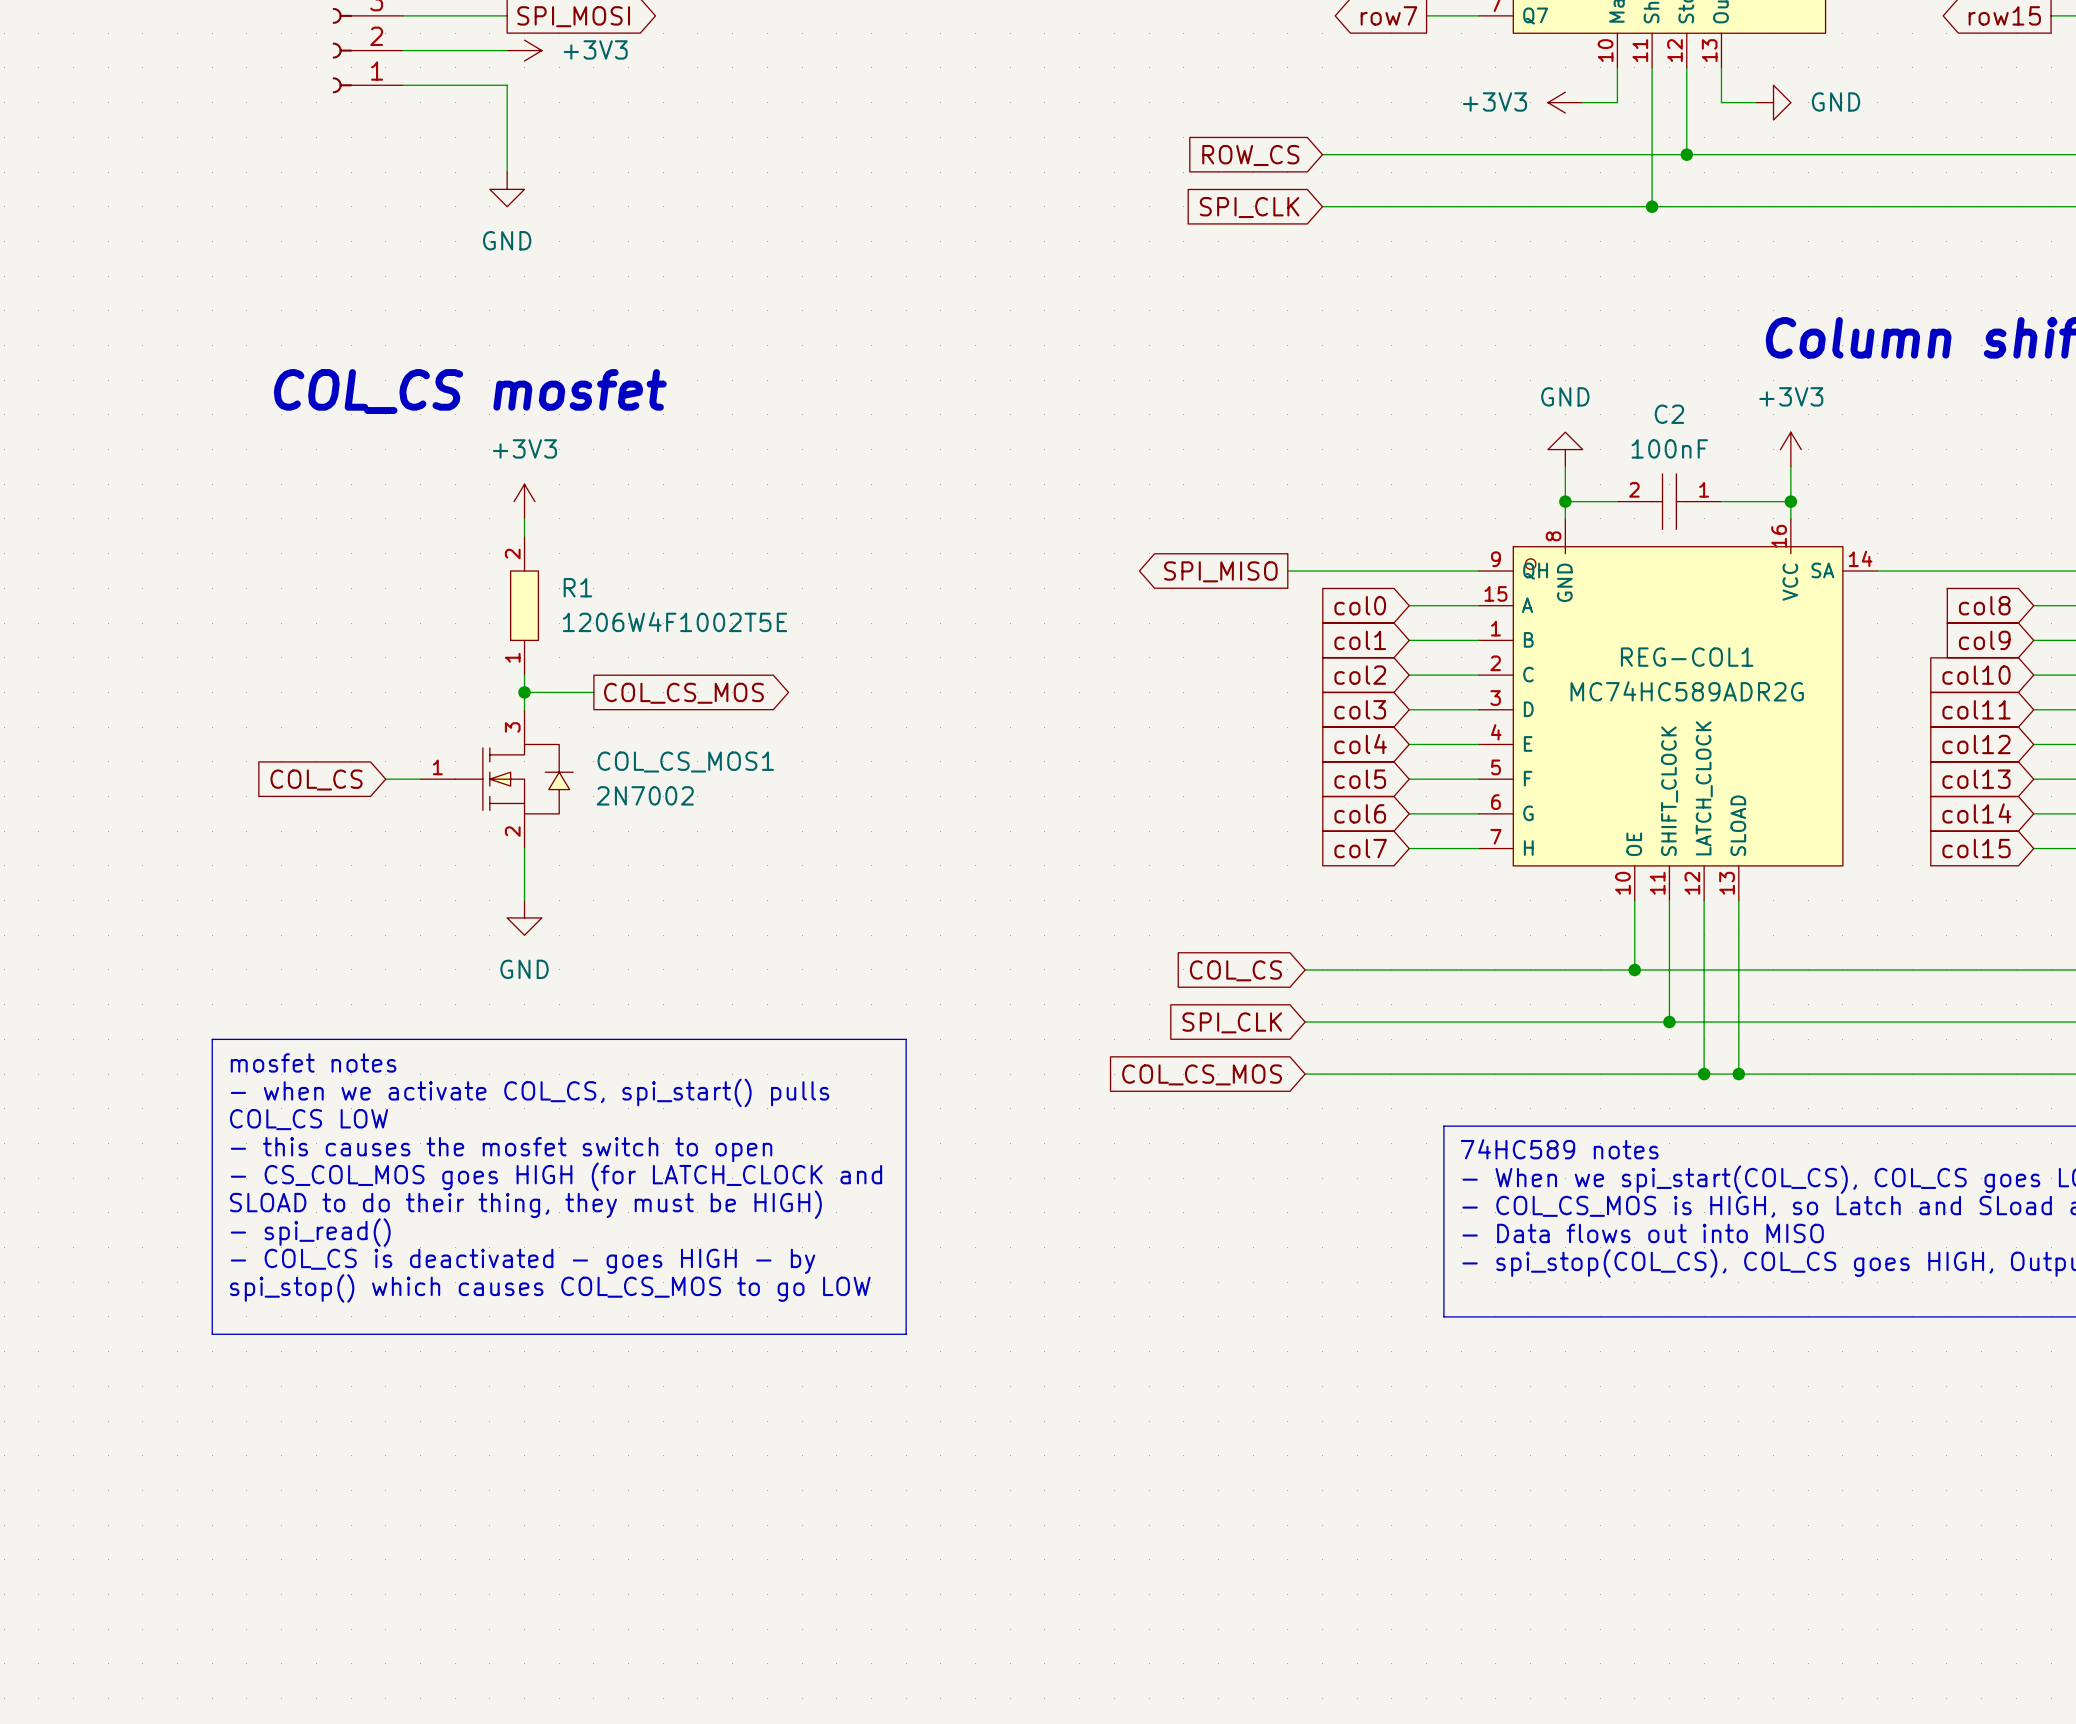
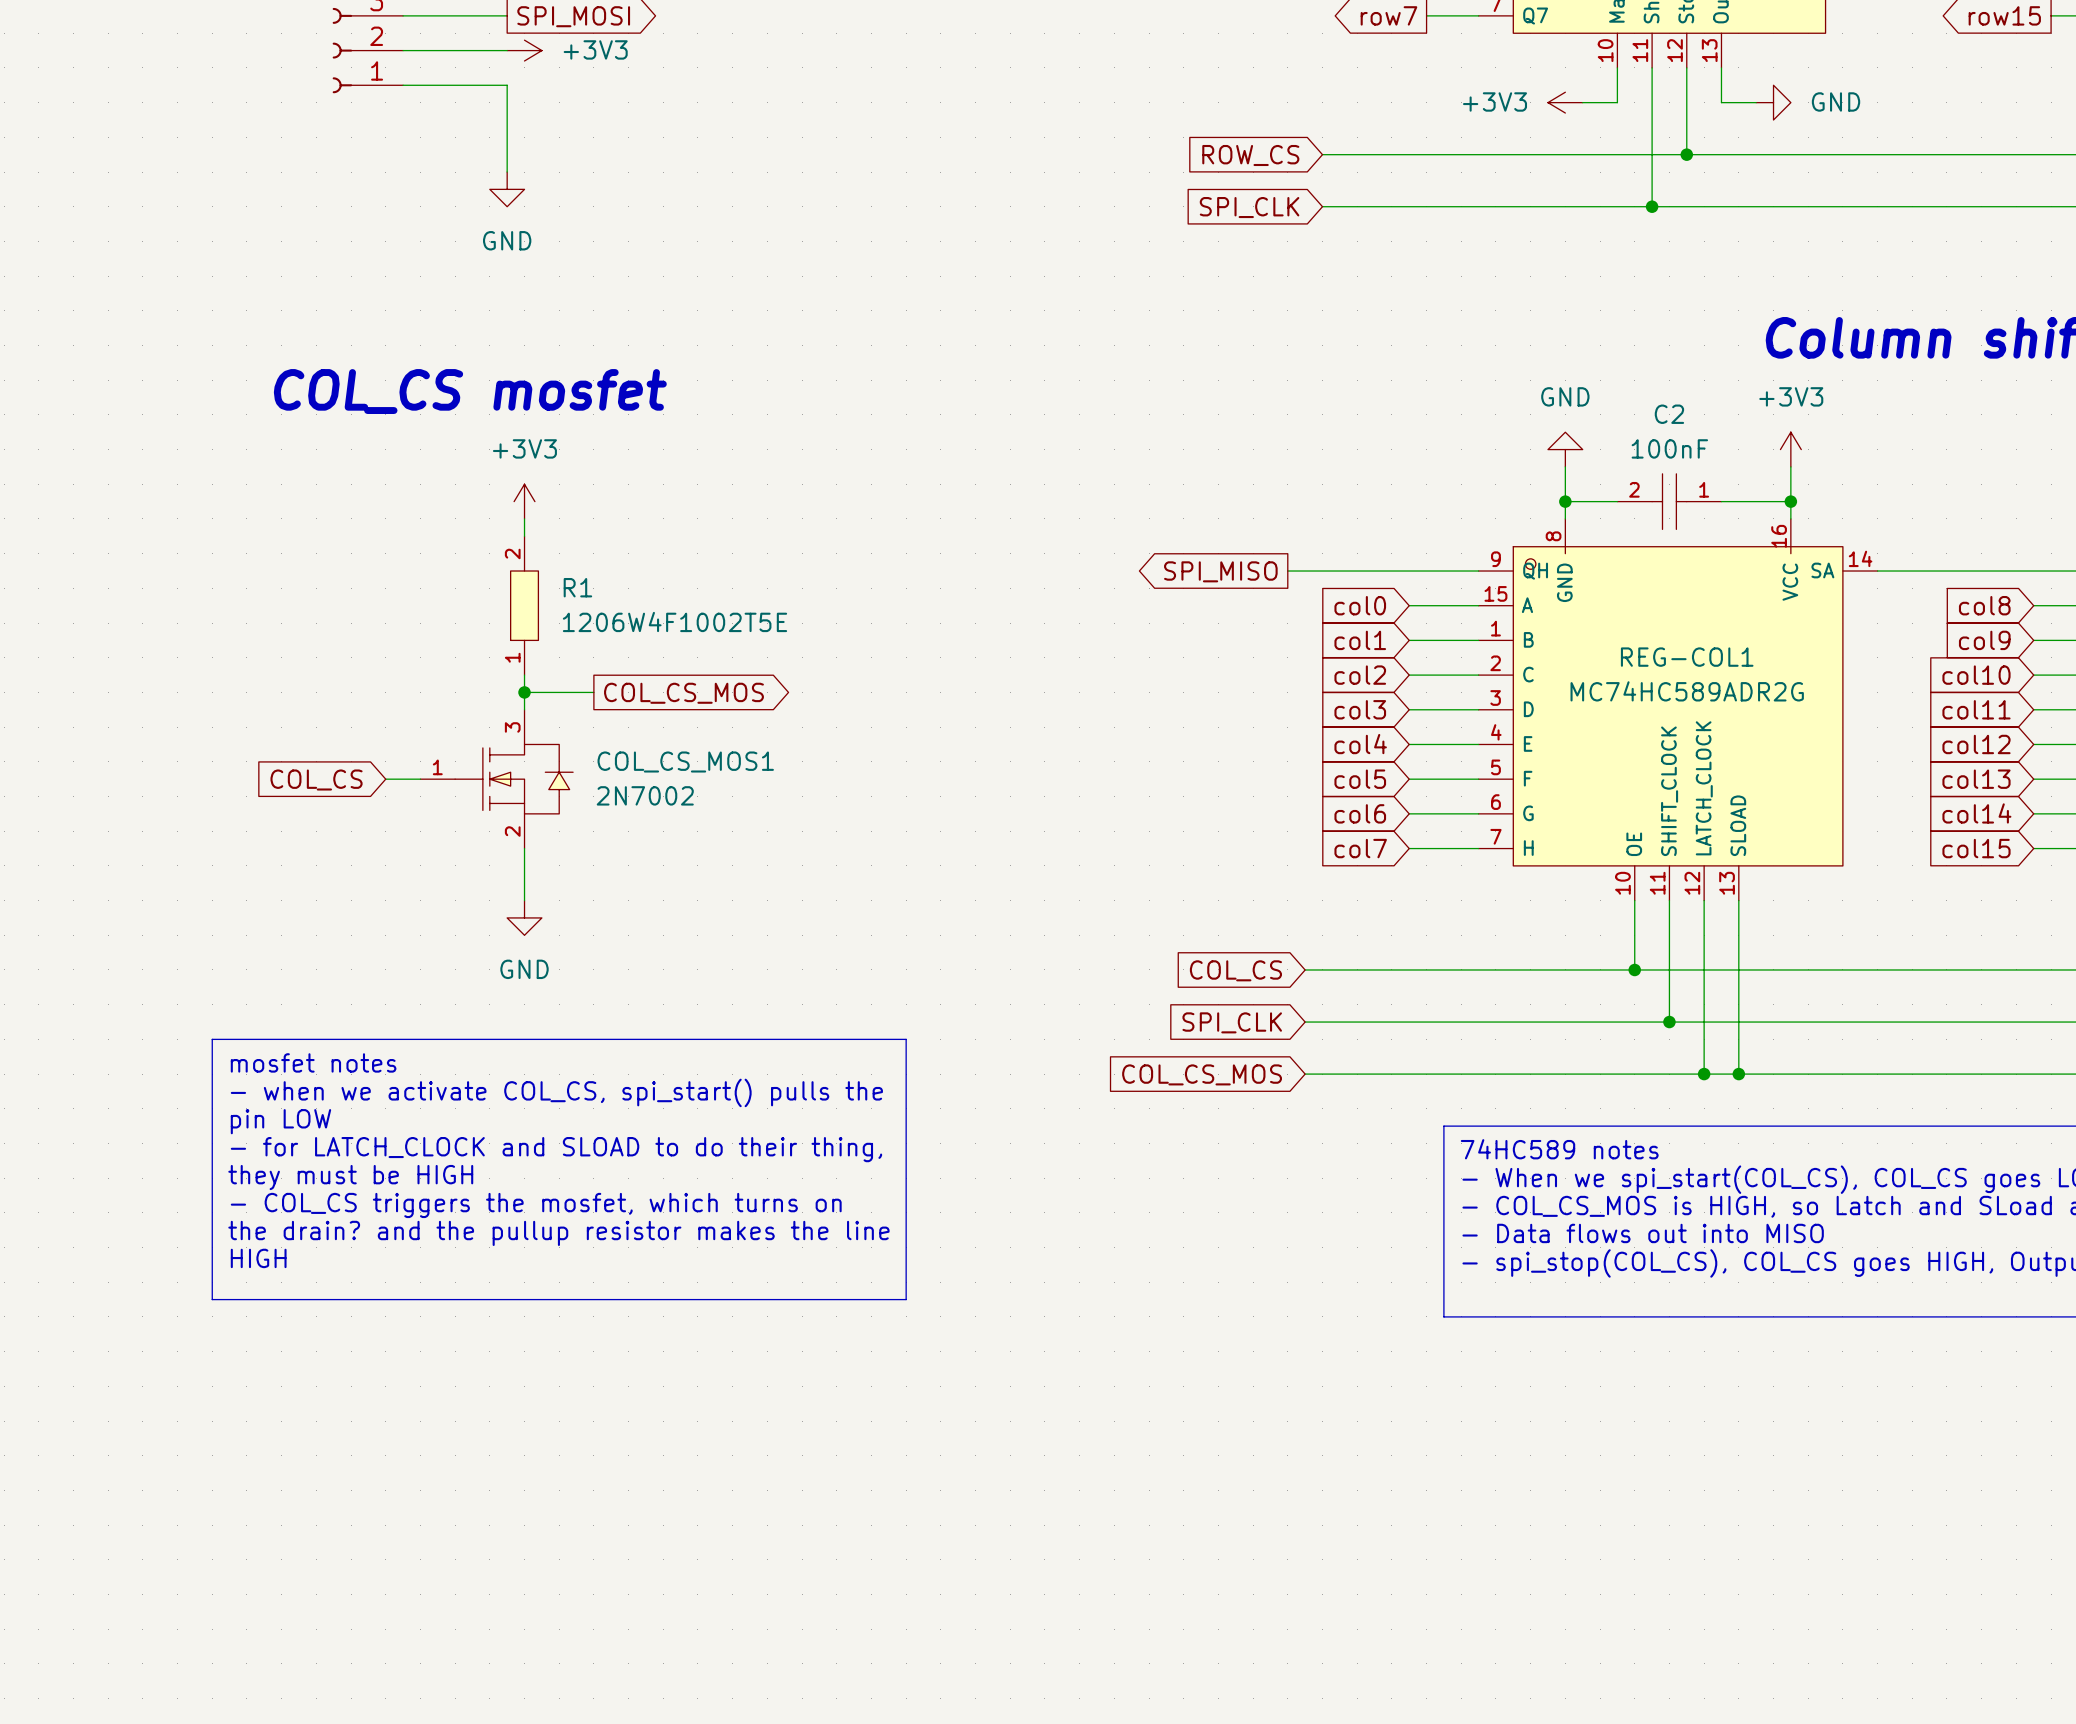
text: - when we activate COL_CS, spi_start() pulls (530, 1092) -> - when we activate COL_CS, spi_start() pulls the (556, 1092)
text: COL_CS LOW (309, 1119) -> pin LOW (280, 1121)
text: - this causes the mosfet switch to open (501, 1149) -> - for LATCH_CLOCK and SLOAD to do their thing, (556, 1149)
text: - CS_COL_MOS goes HIGH (for LATCH_CLOCK and (556, 1176) -> they must be HIGH (350, 1177)
text: SLOAD to do their thing, they must be HIGH) (525, 1204) -> - COL_CS triggers the mosfet, which turns on (536, 1205)
text: - spi_read() (310, 1232) -> the drain? and the pullup resistor makes the line (558, 1233)
text: - COL_CS is deactivated - goes HIGH - by (523, 1261) -> HIGH (258, 1258)
text: spi_stop() which causes COL_CS_MOS to go LOW (550, 1288) -> none
line: (212, 1299) (212, 1334) (906, 1334) (906, 1299) -> (212, 1299) (906, 1299)

